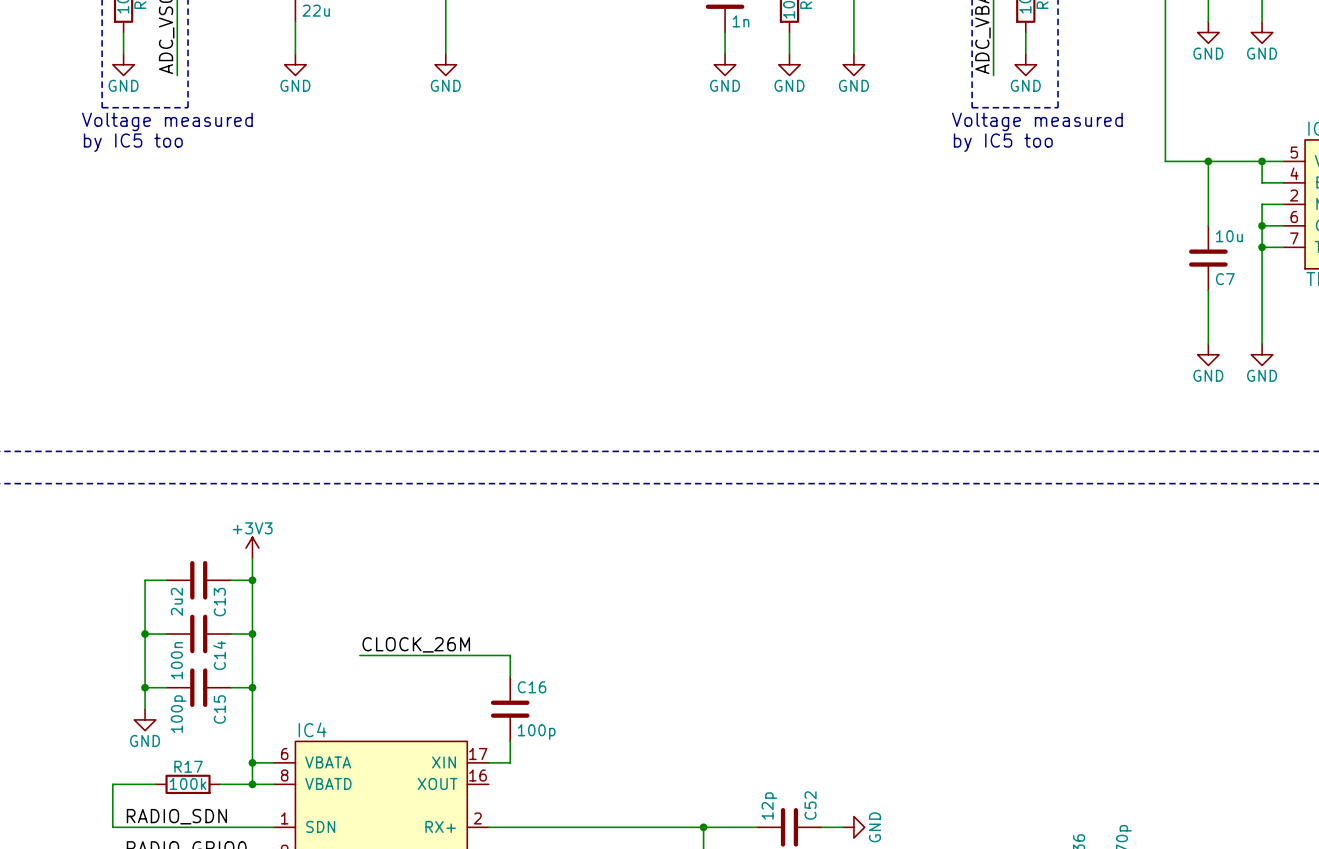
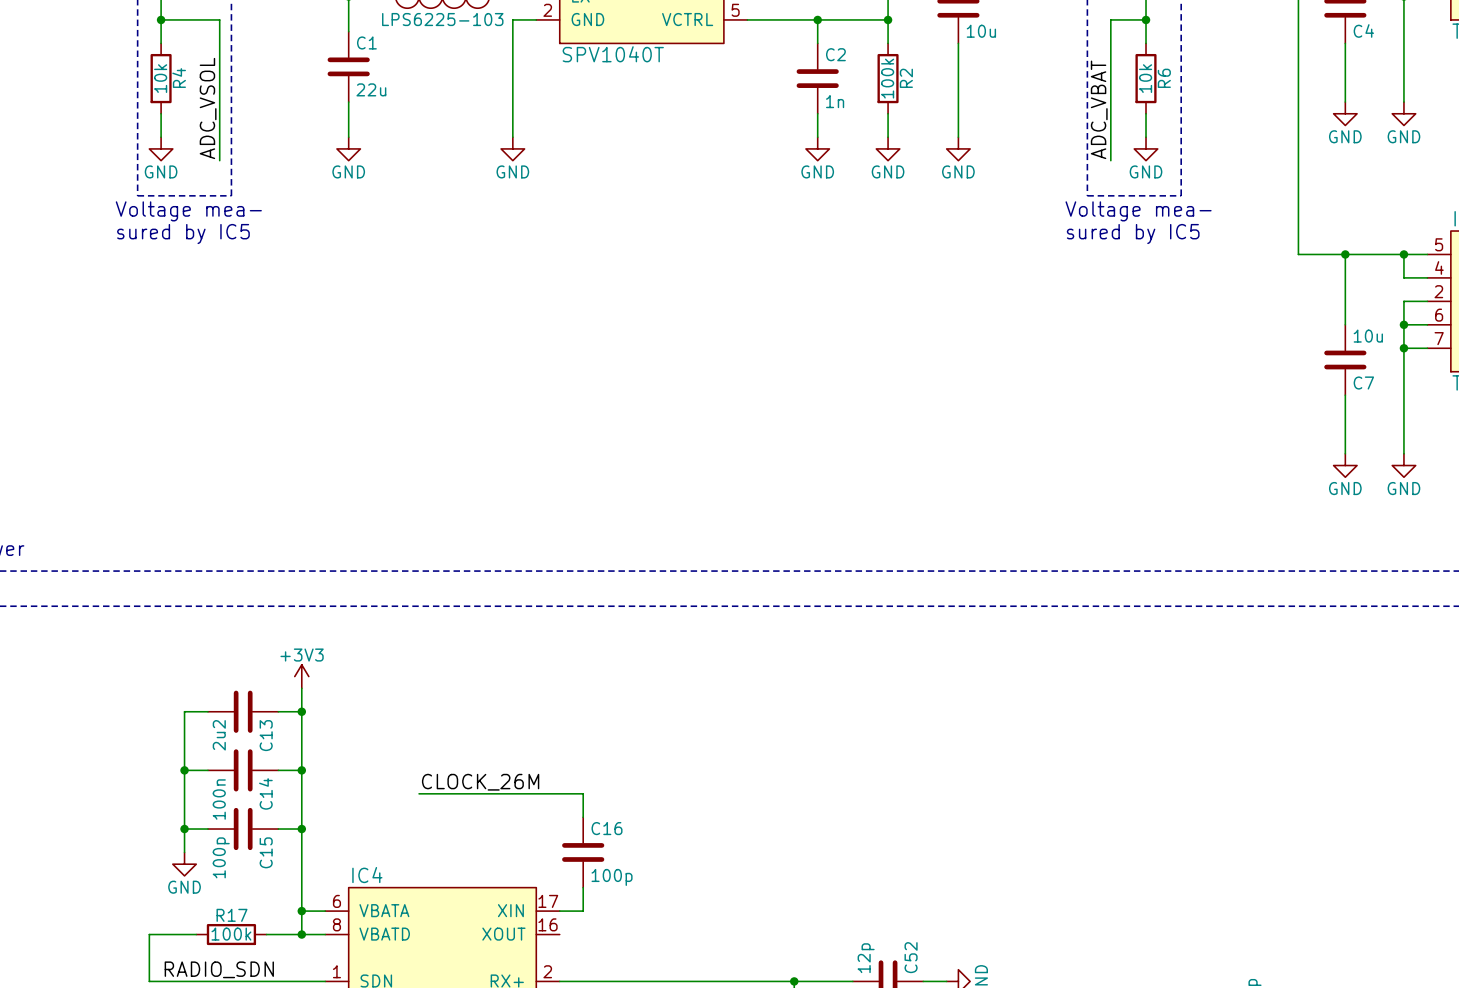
text: Voltage measured (167, 121) -> Voltage mea- (188, 211)
text: Voltage measured (1037, 121) -> Voltage mea- (1138, 211)
text: by IC5 too (133, 142) -> sured by IC5 (183, 234)
text: by IC5 too (1003, 142) -> sured by IC5 (1133, 234)

